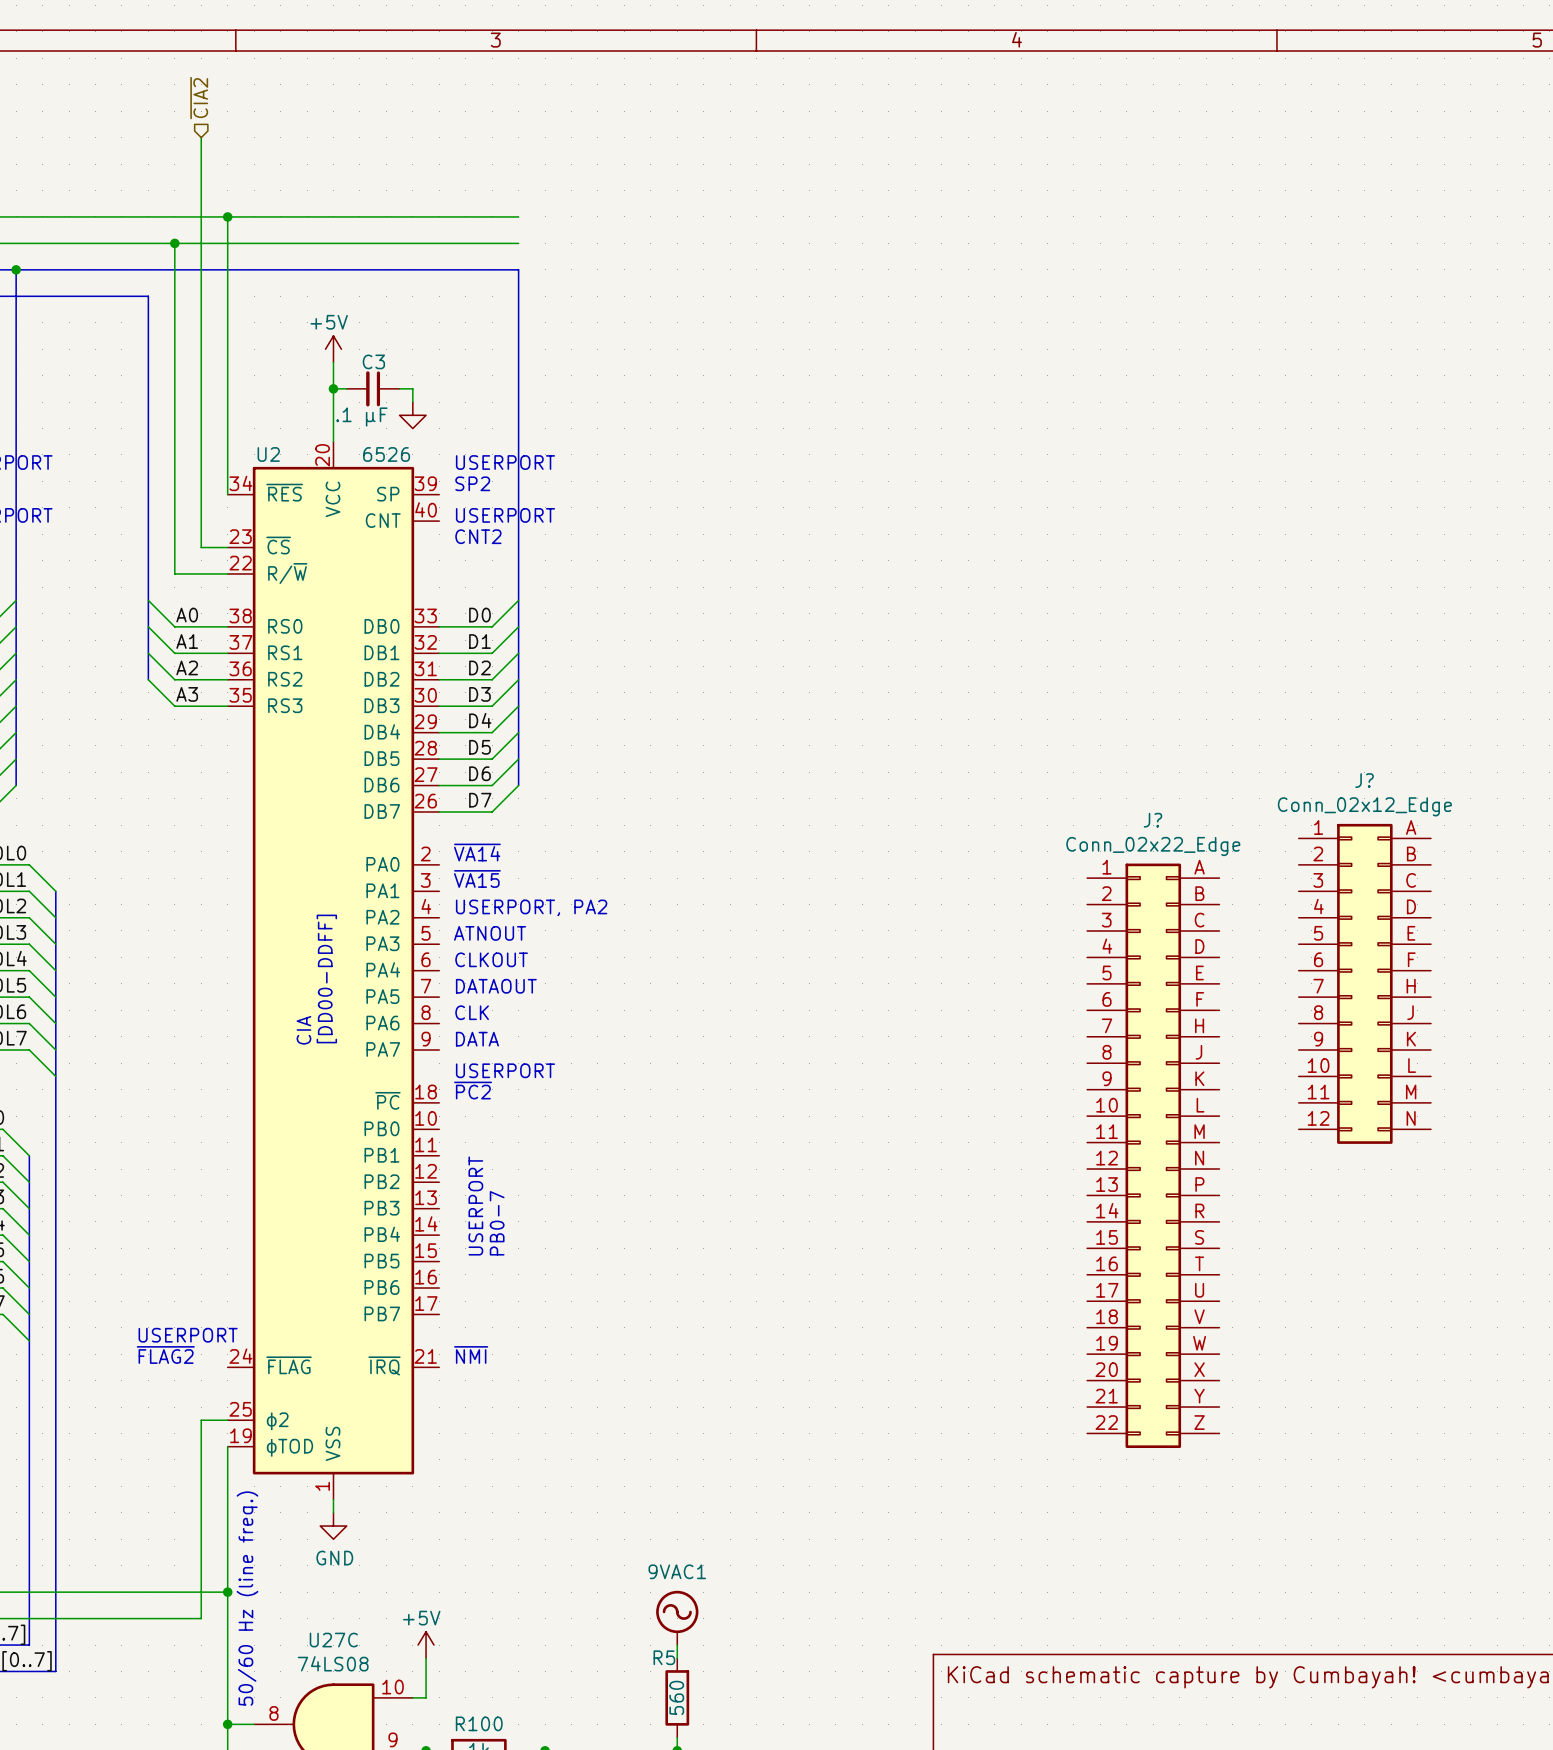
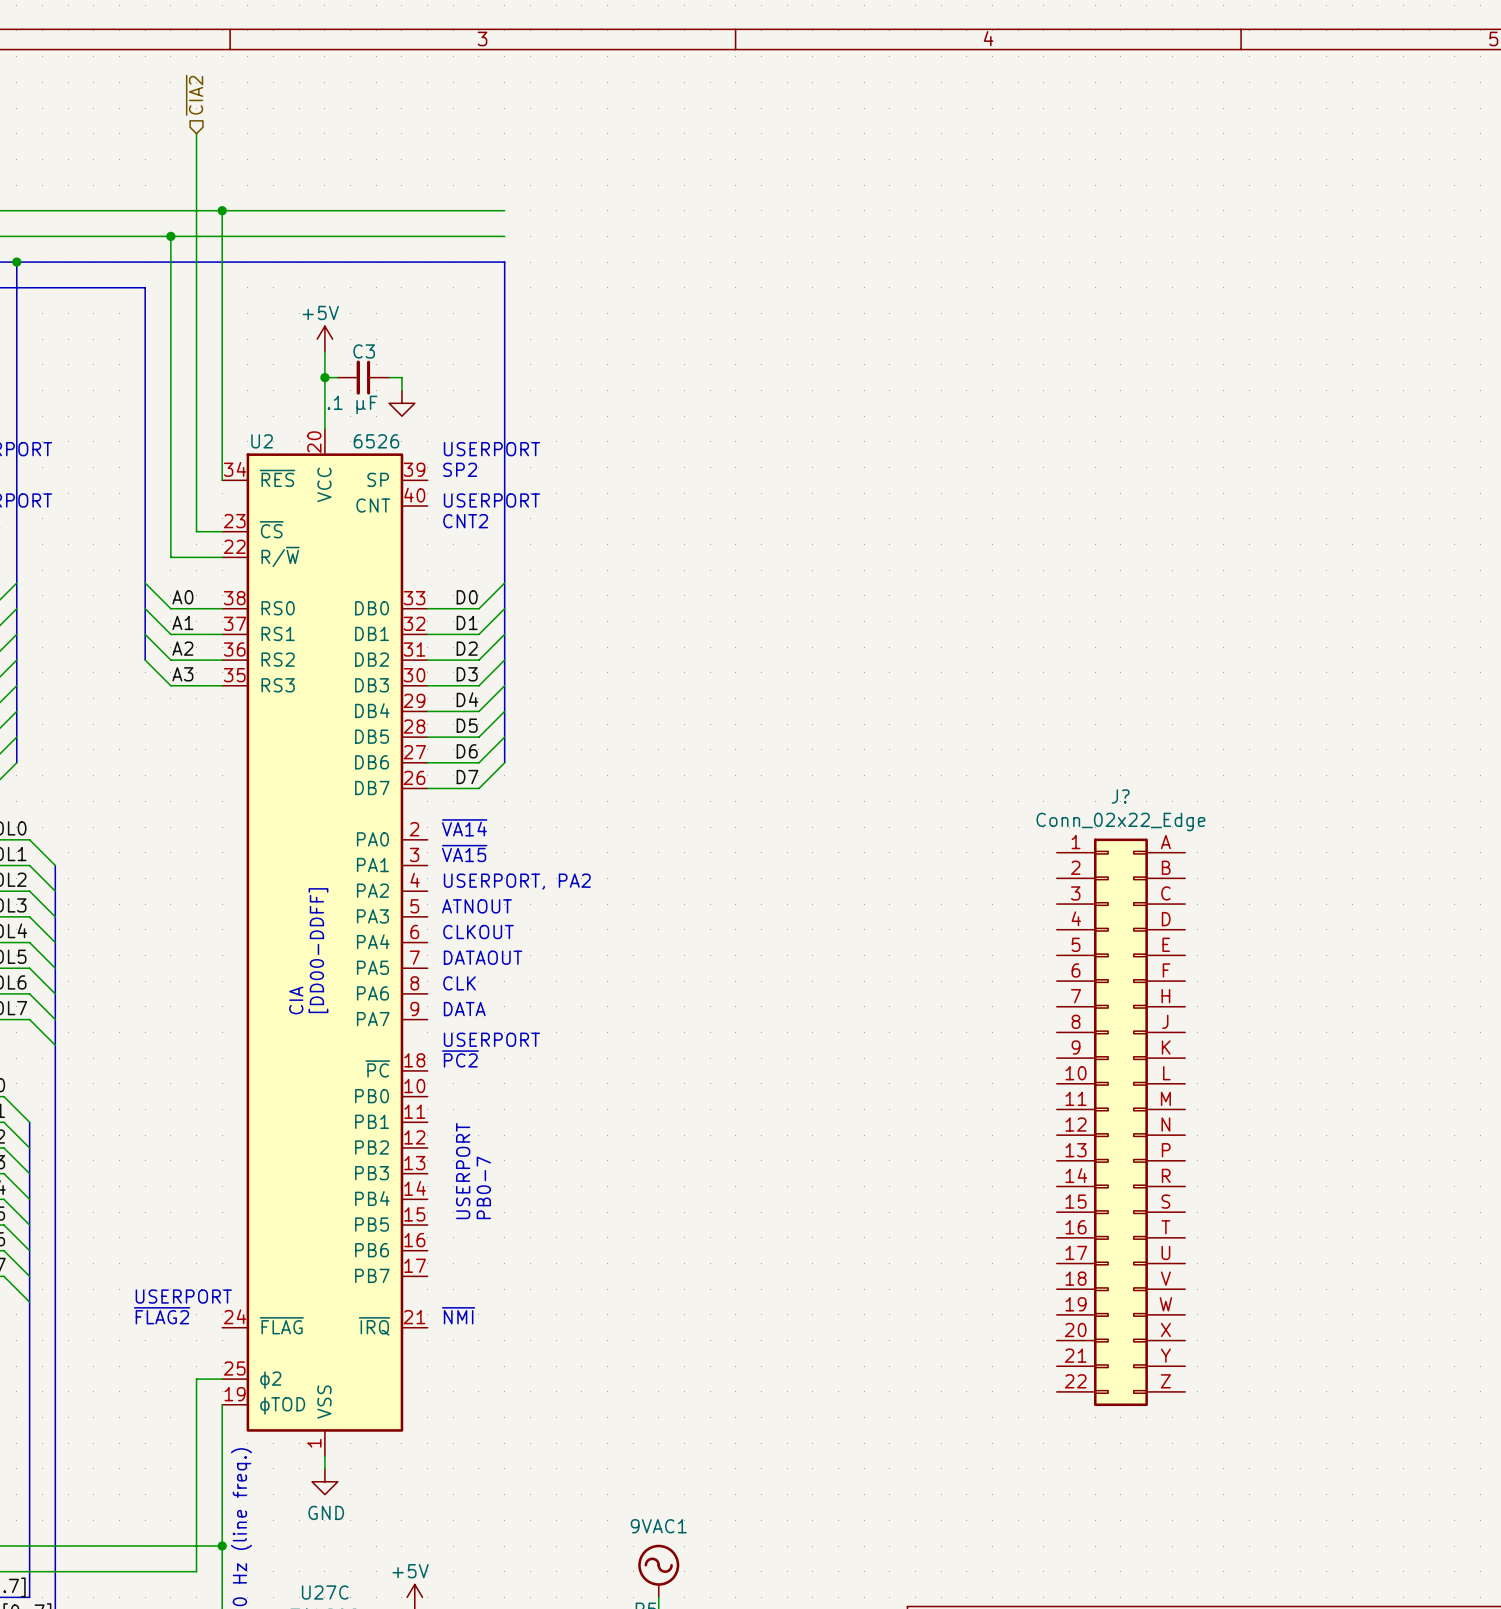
J?: Conn_02x12_Edge (1364, 983) -> none

